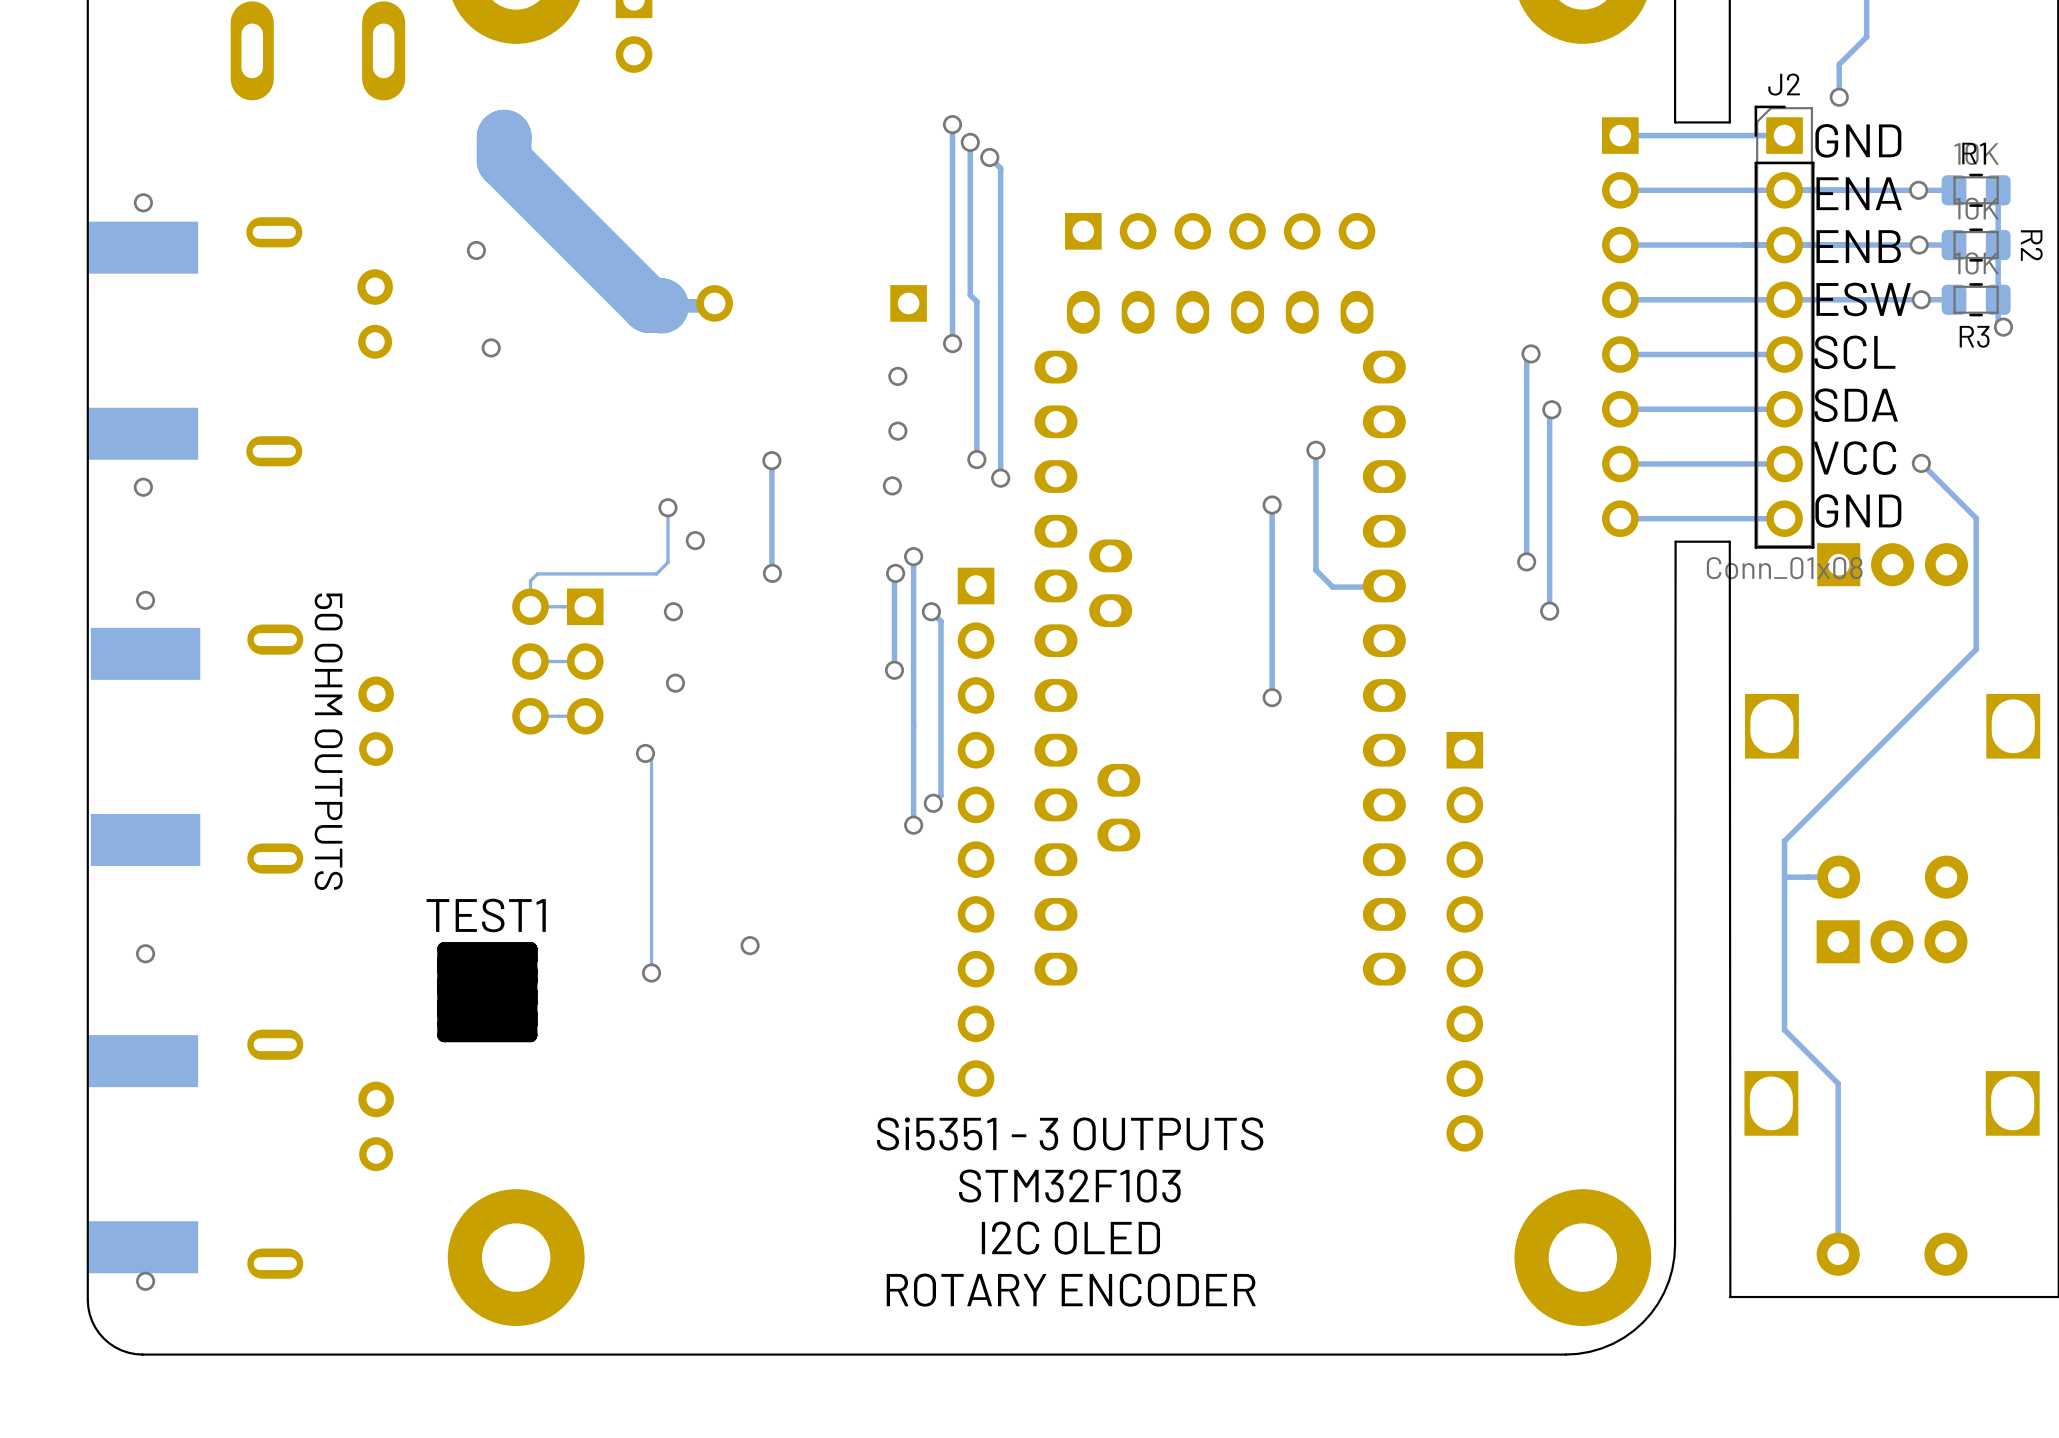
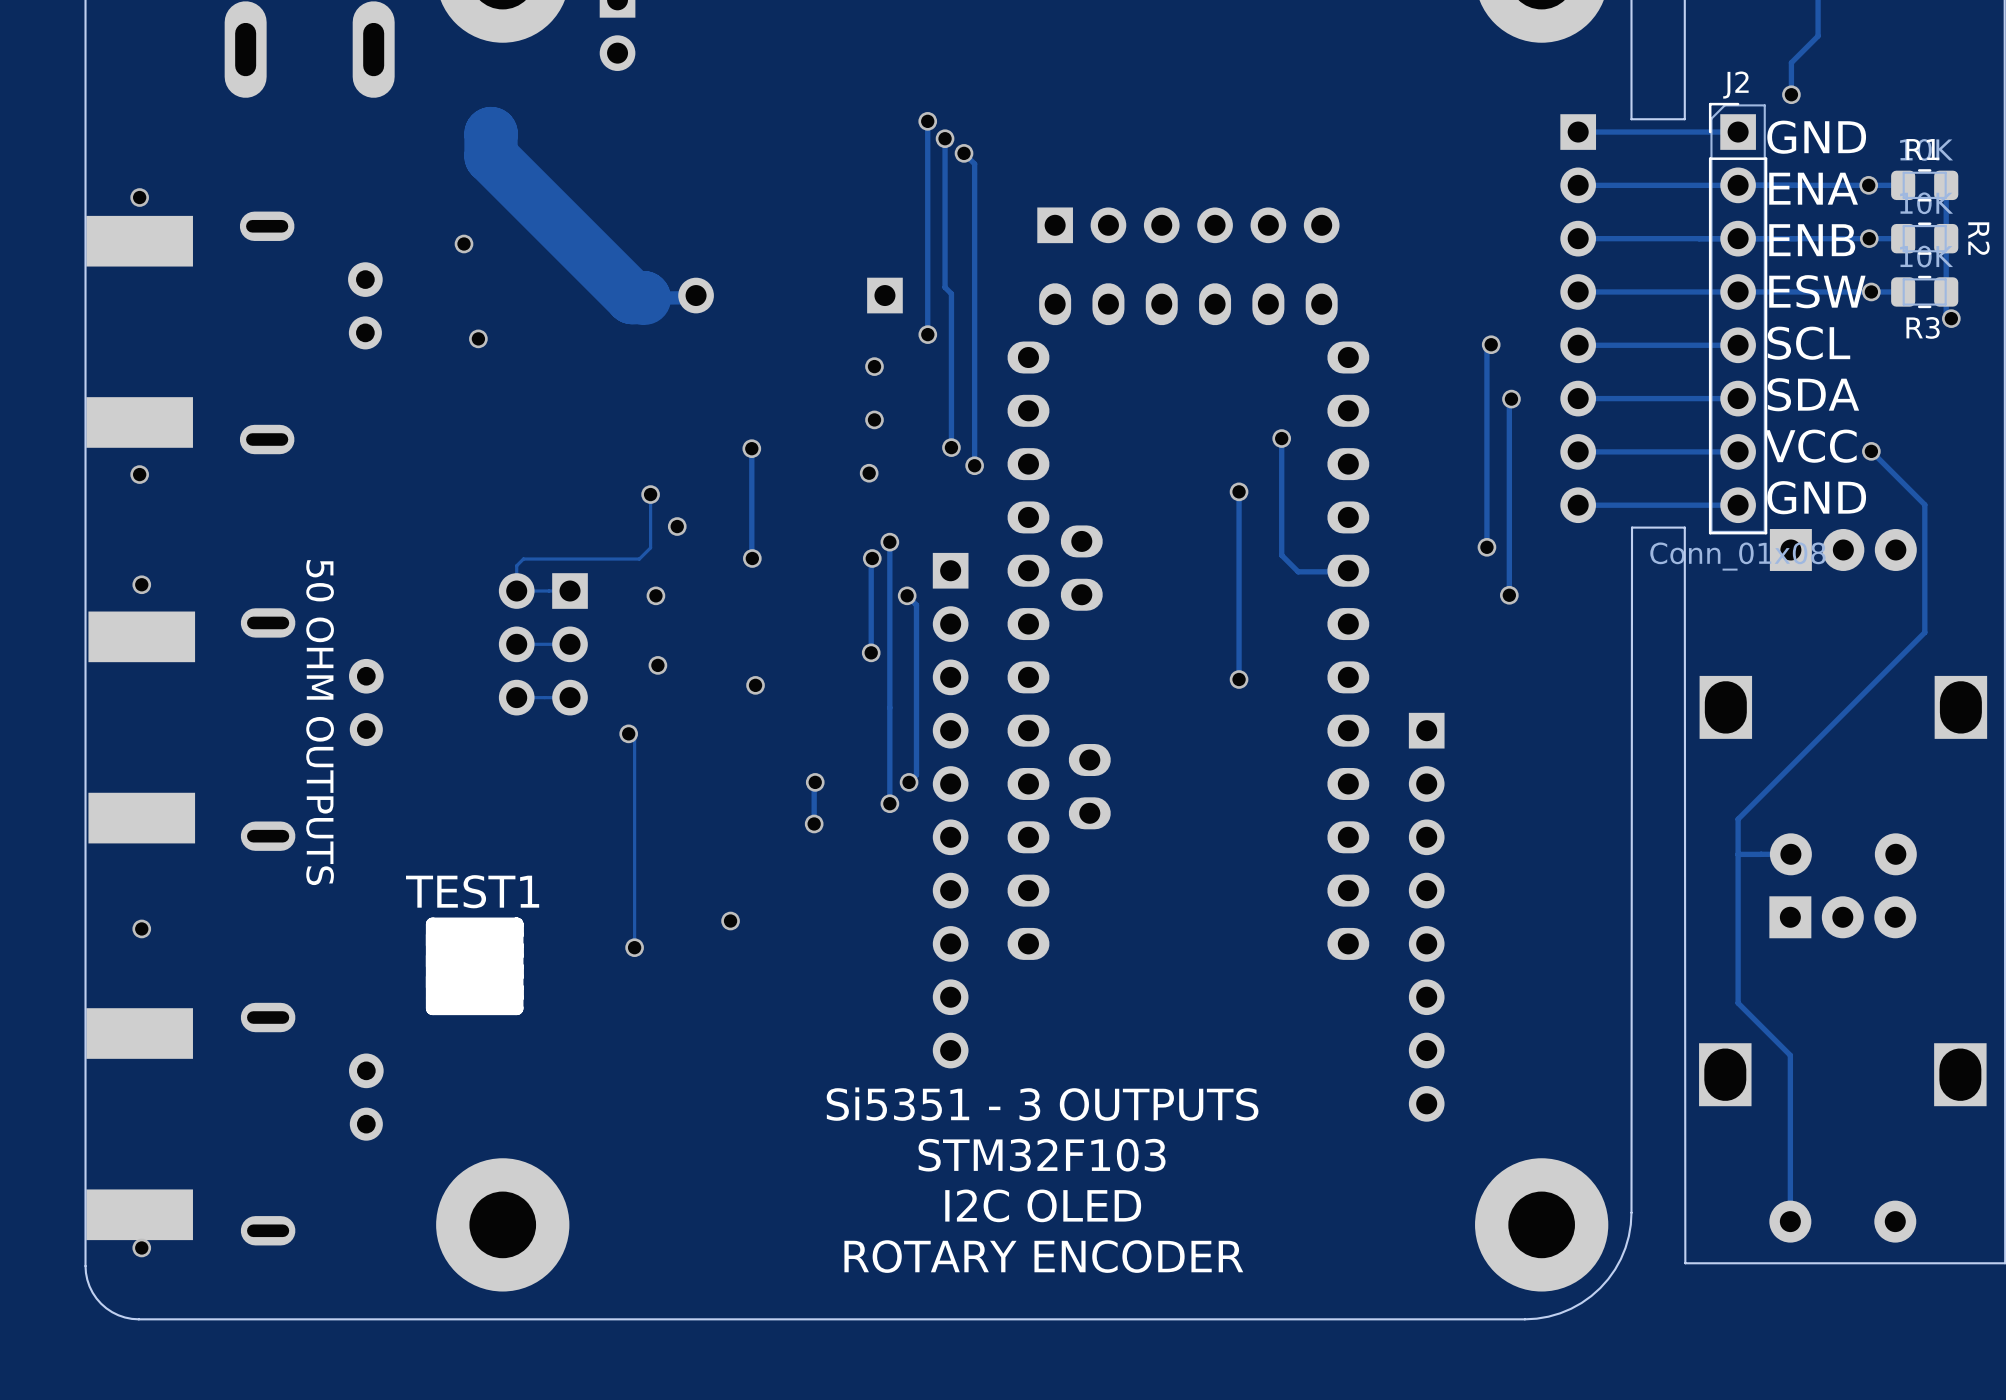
via: none -> (755, 685)
track: none -> (815, 782) (814, 823)
via: none -> (815, 782)
via: none -> (814, 823)

